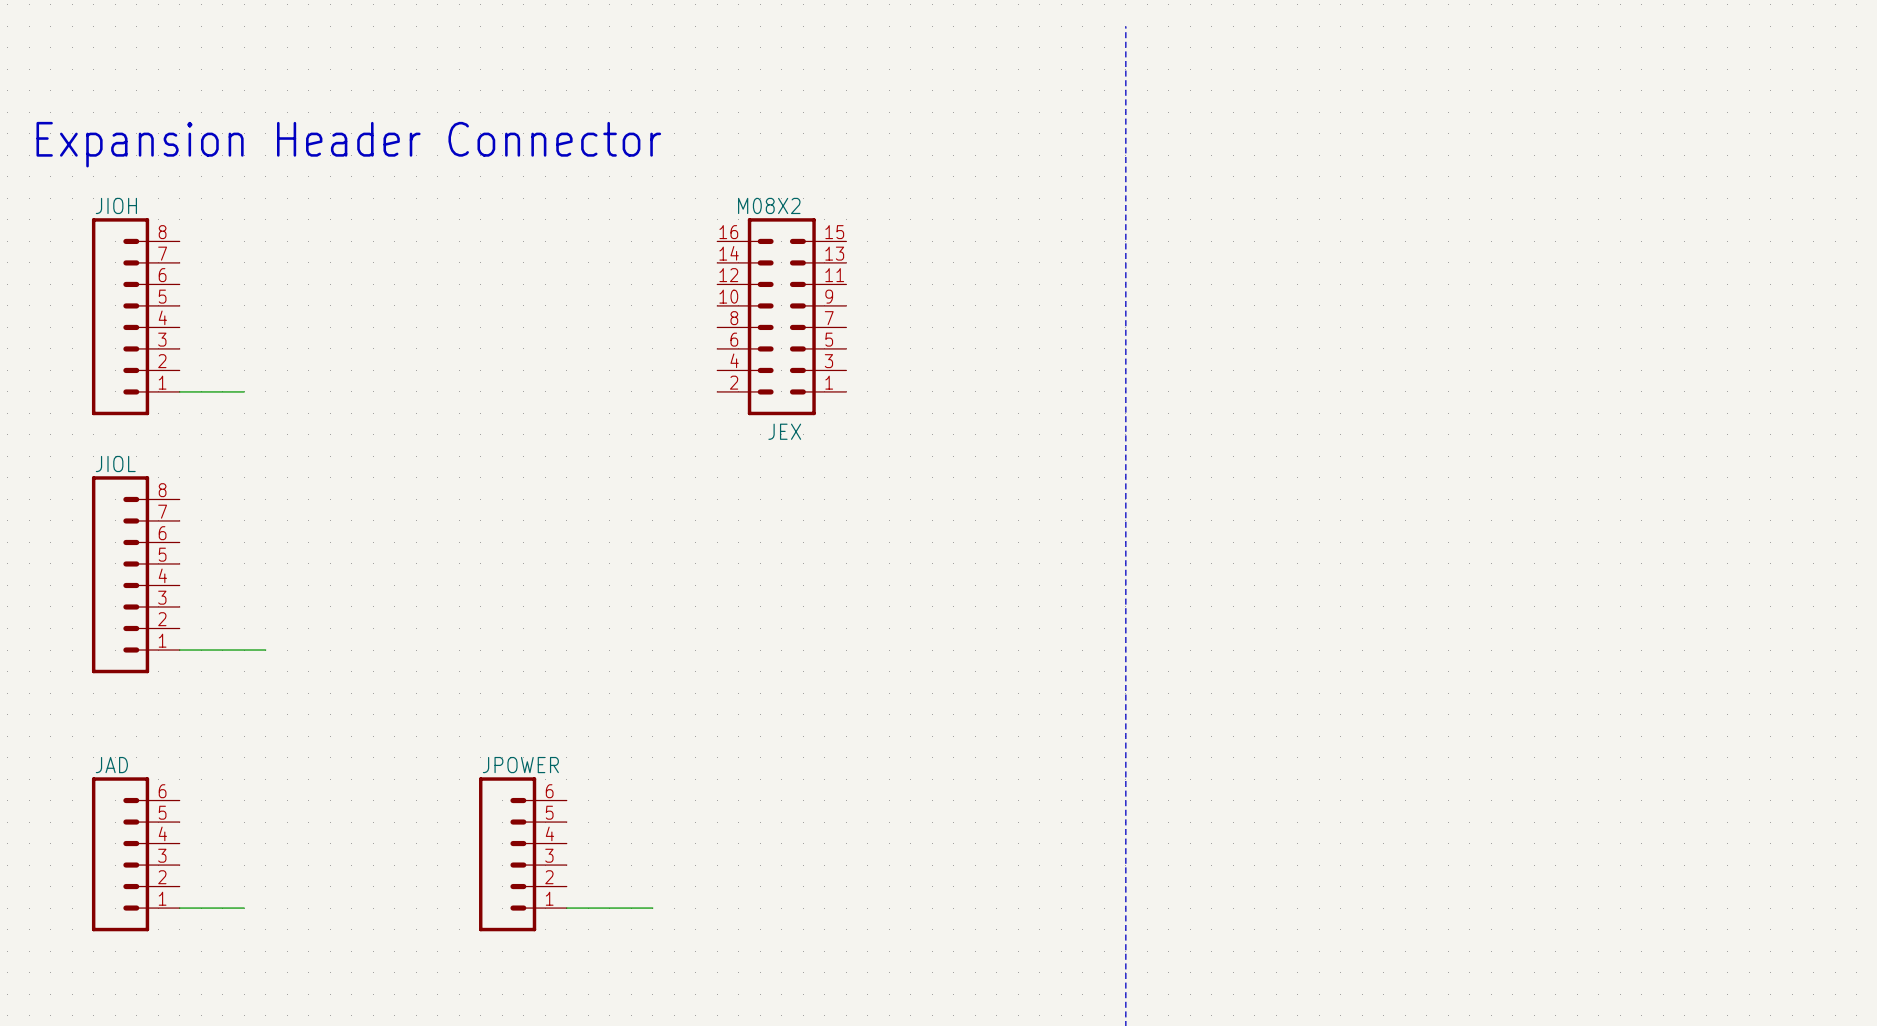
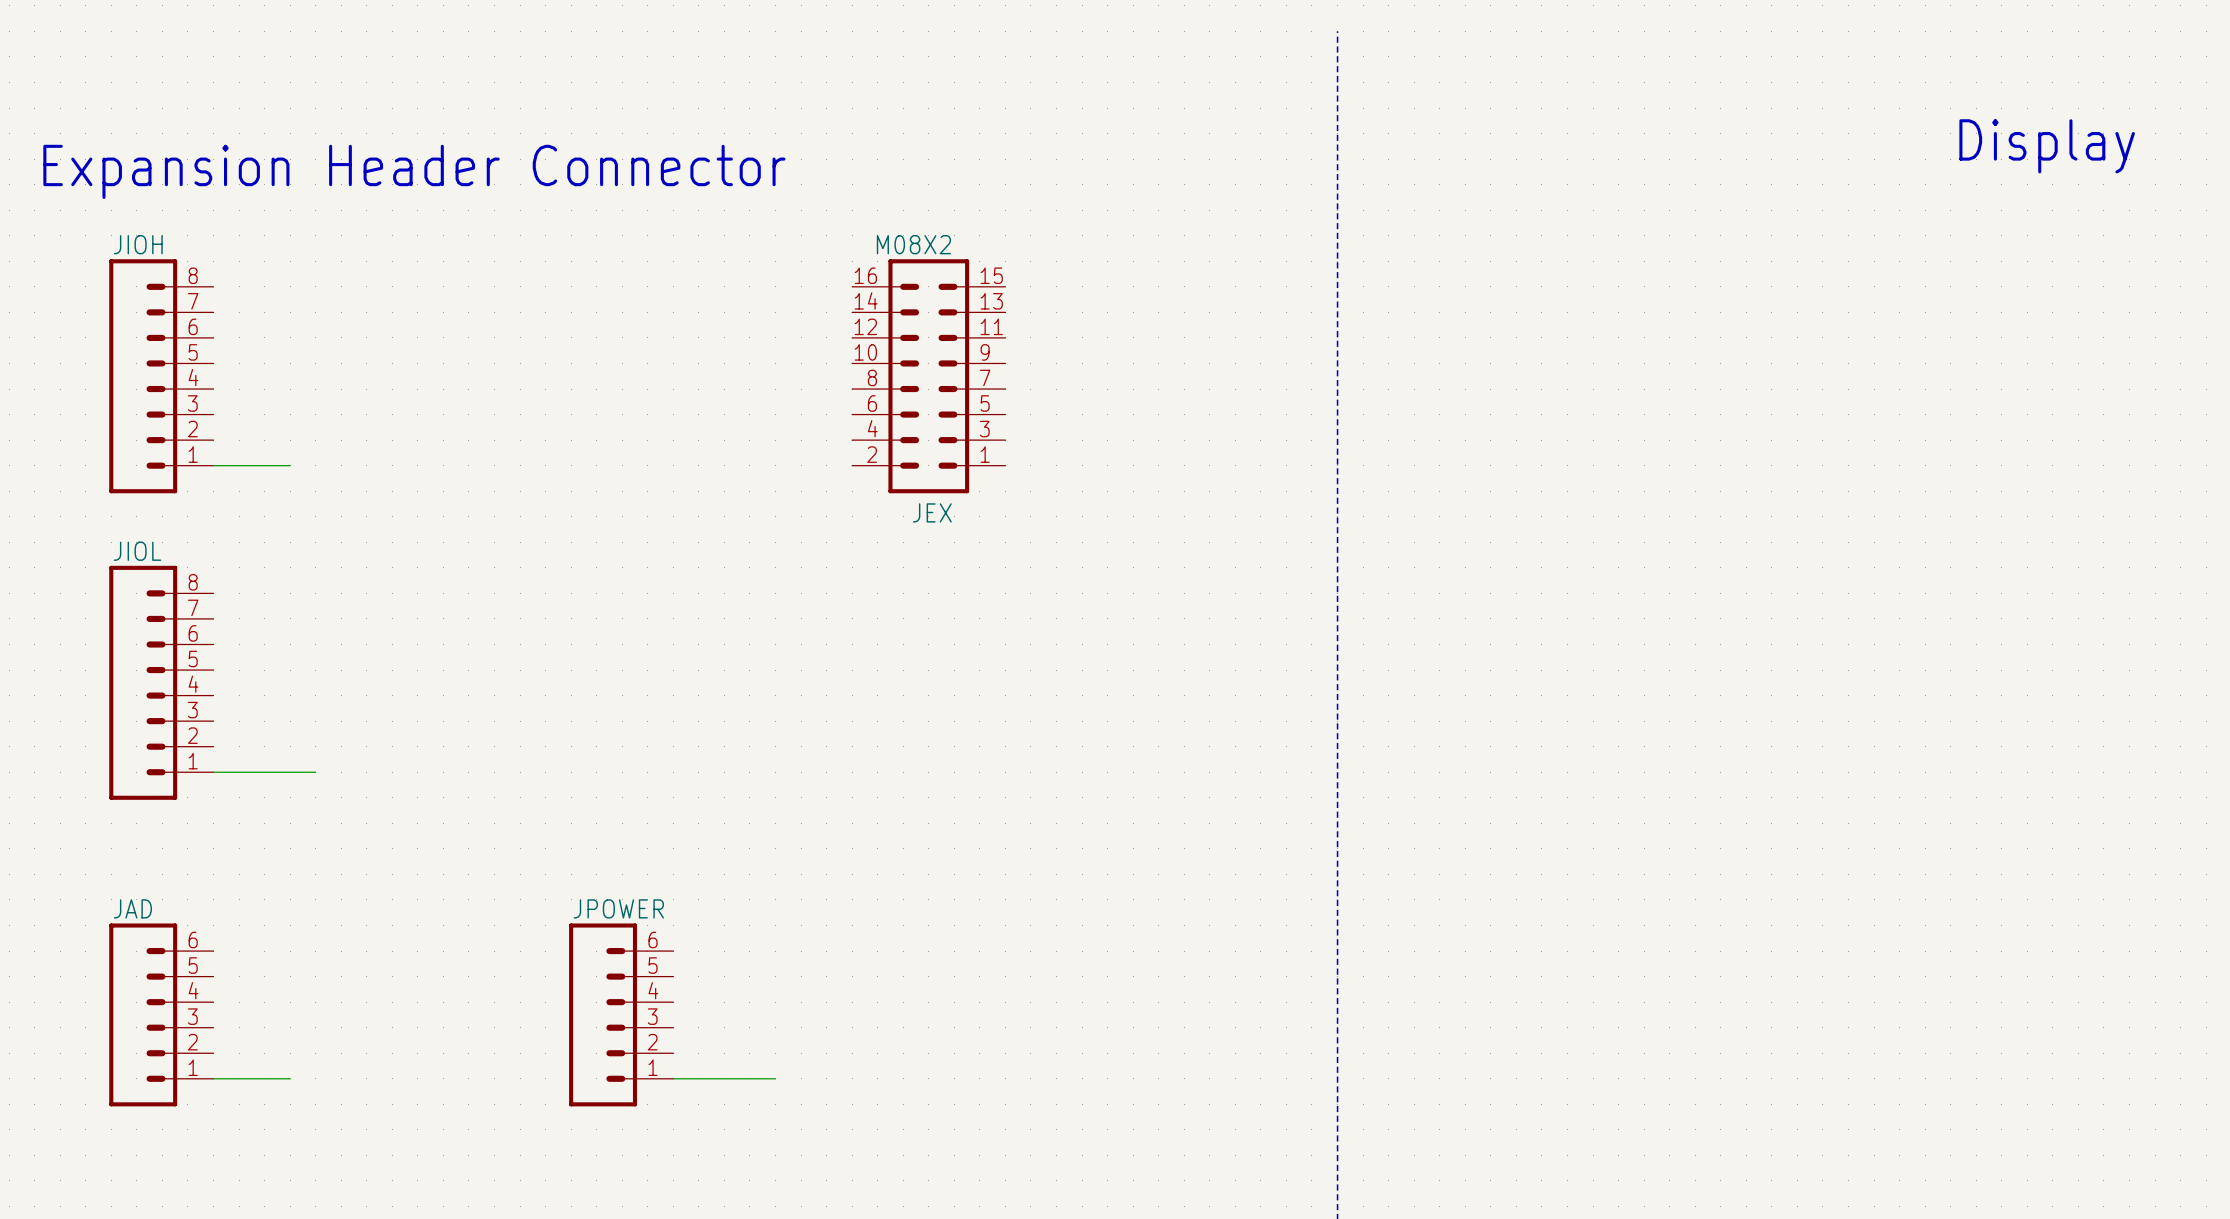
text: none -> Display (2047, 146)

